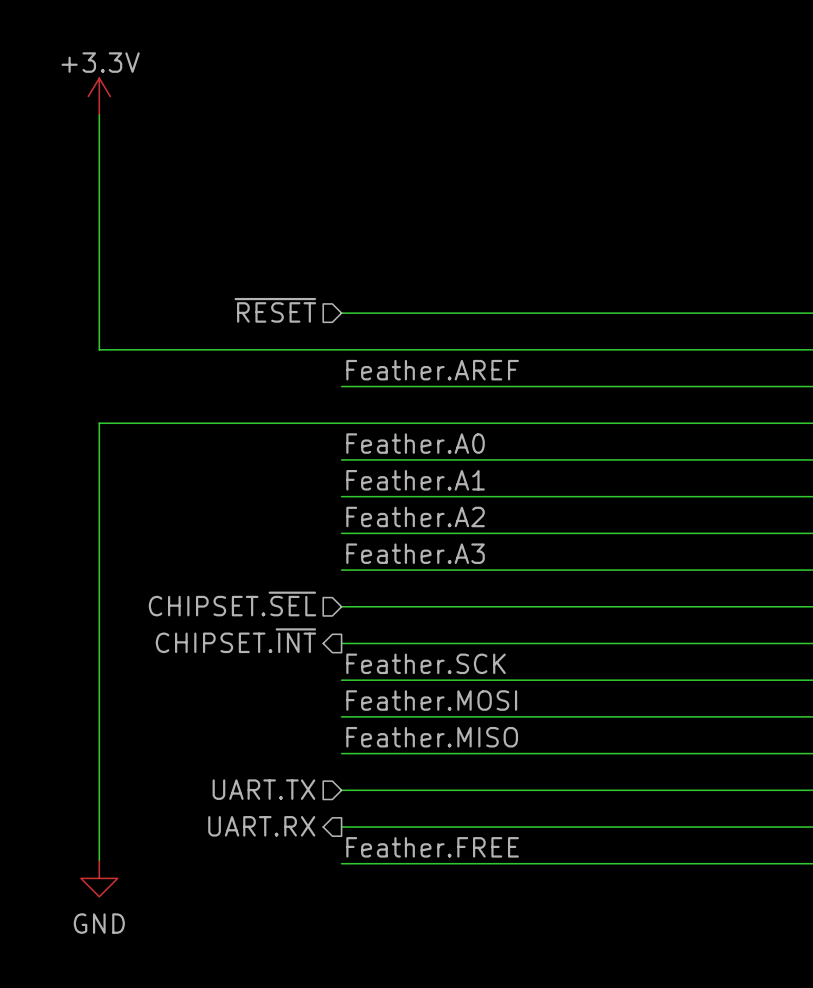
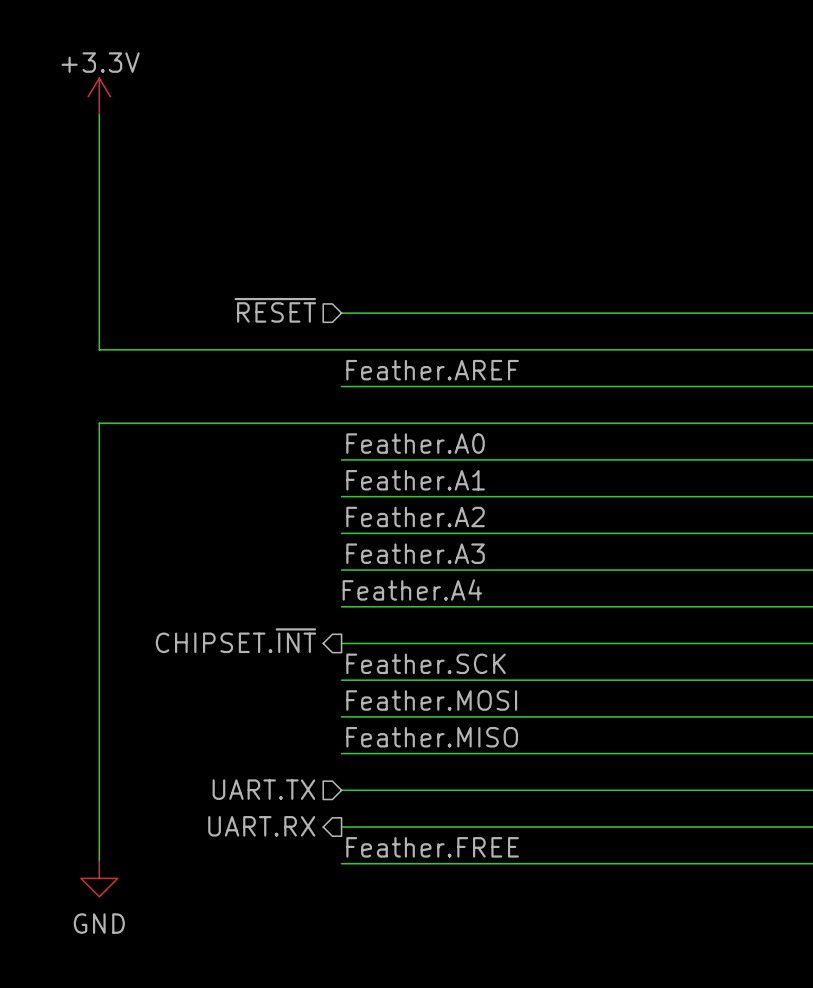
label: none -> Feather.A4 (412, 589)
hierarchical label: CHIPSET.~{SEL} (232, 603) -> none

